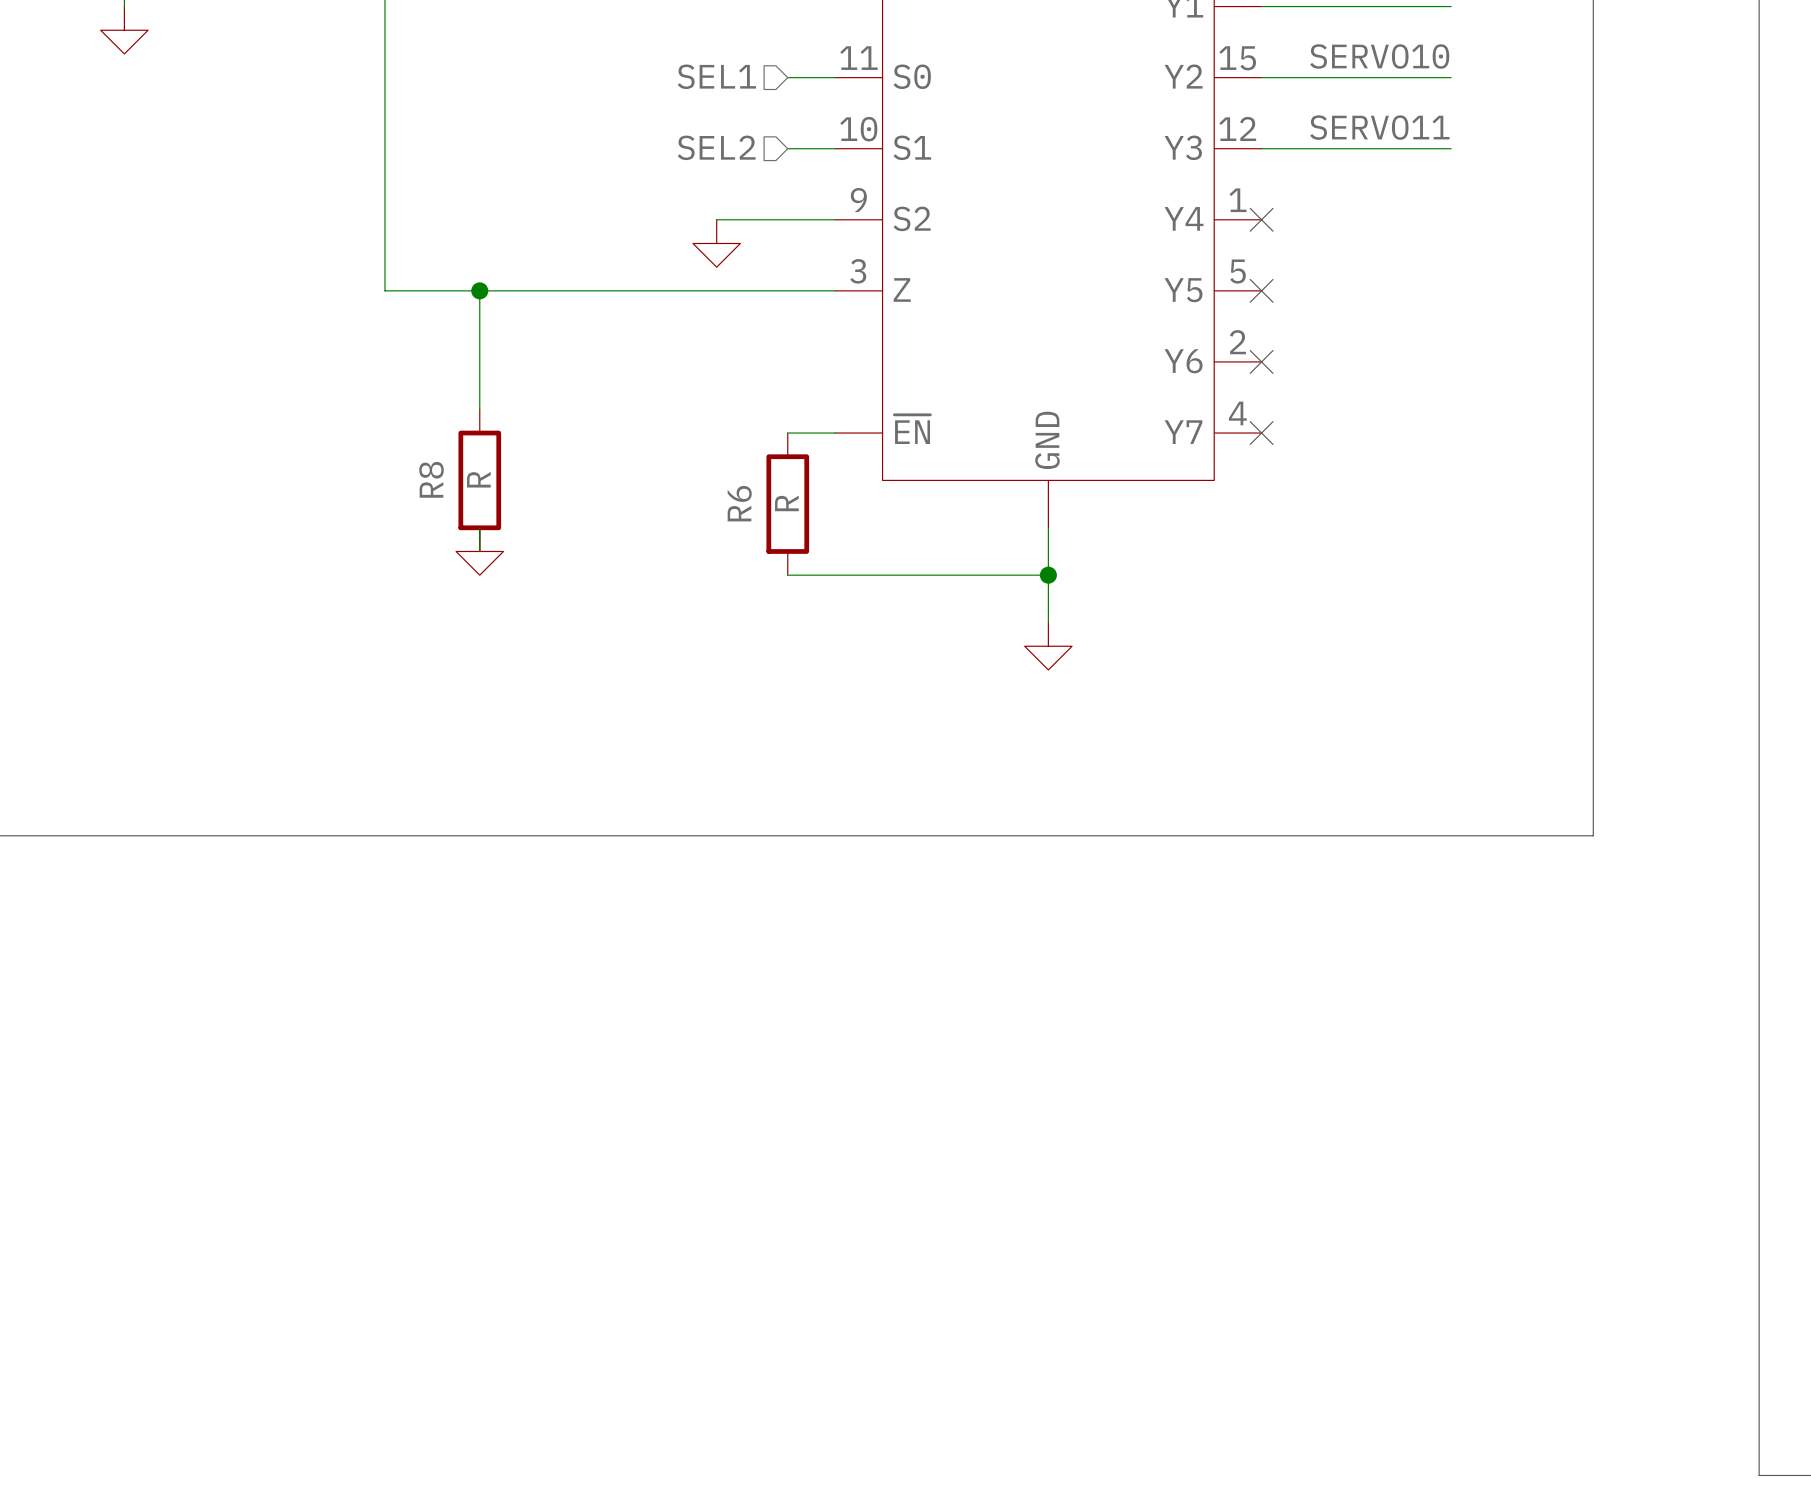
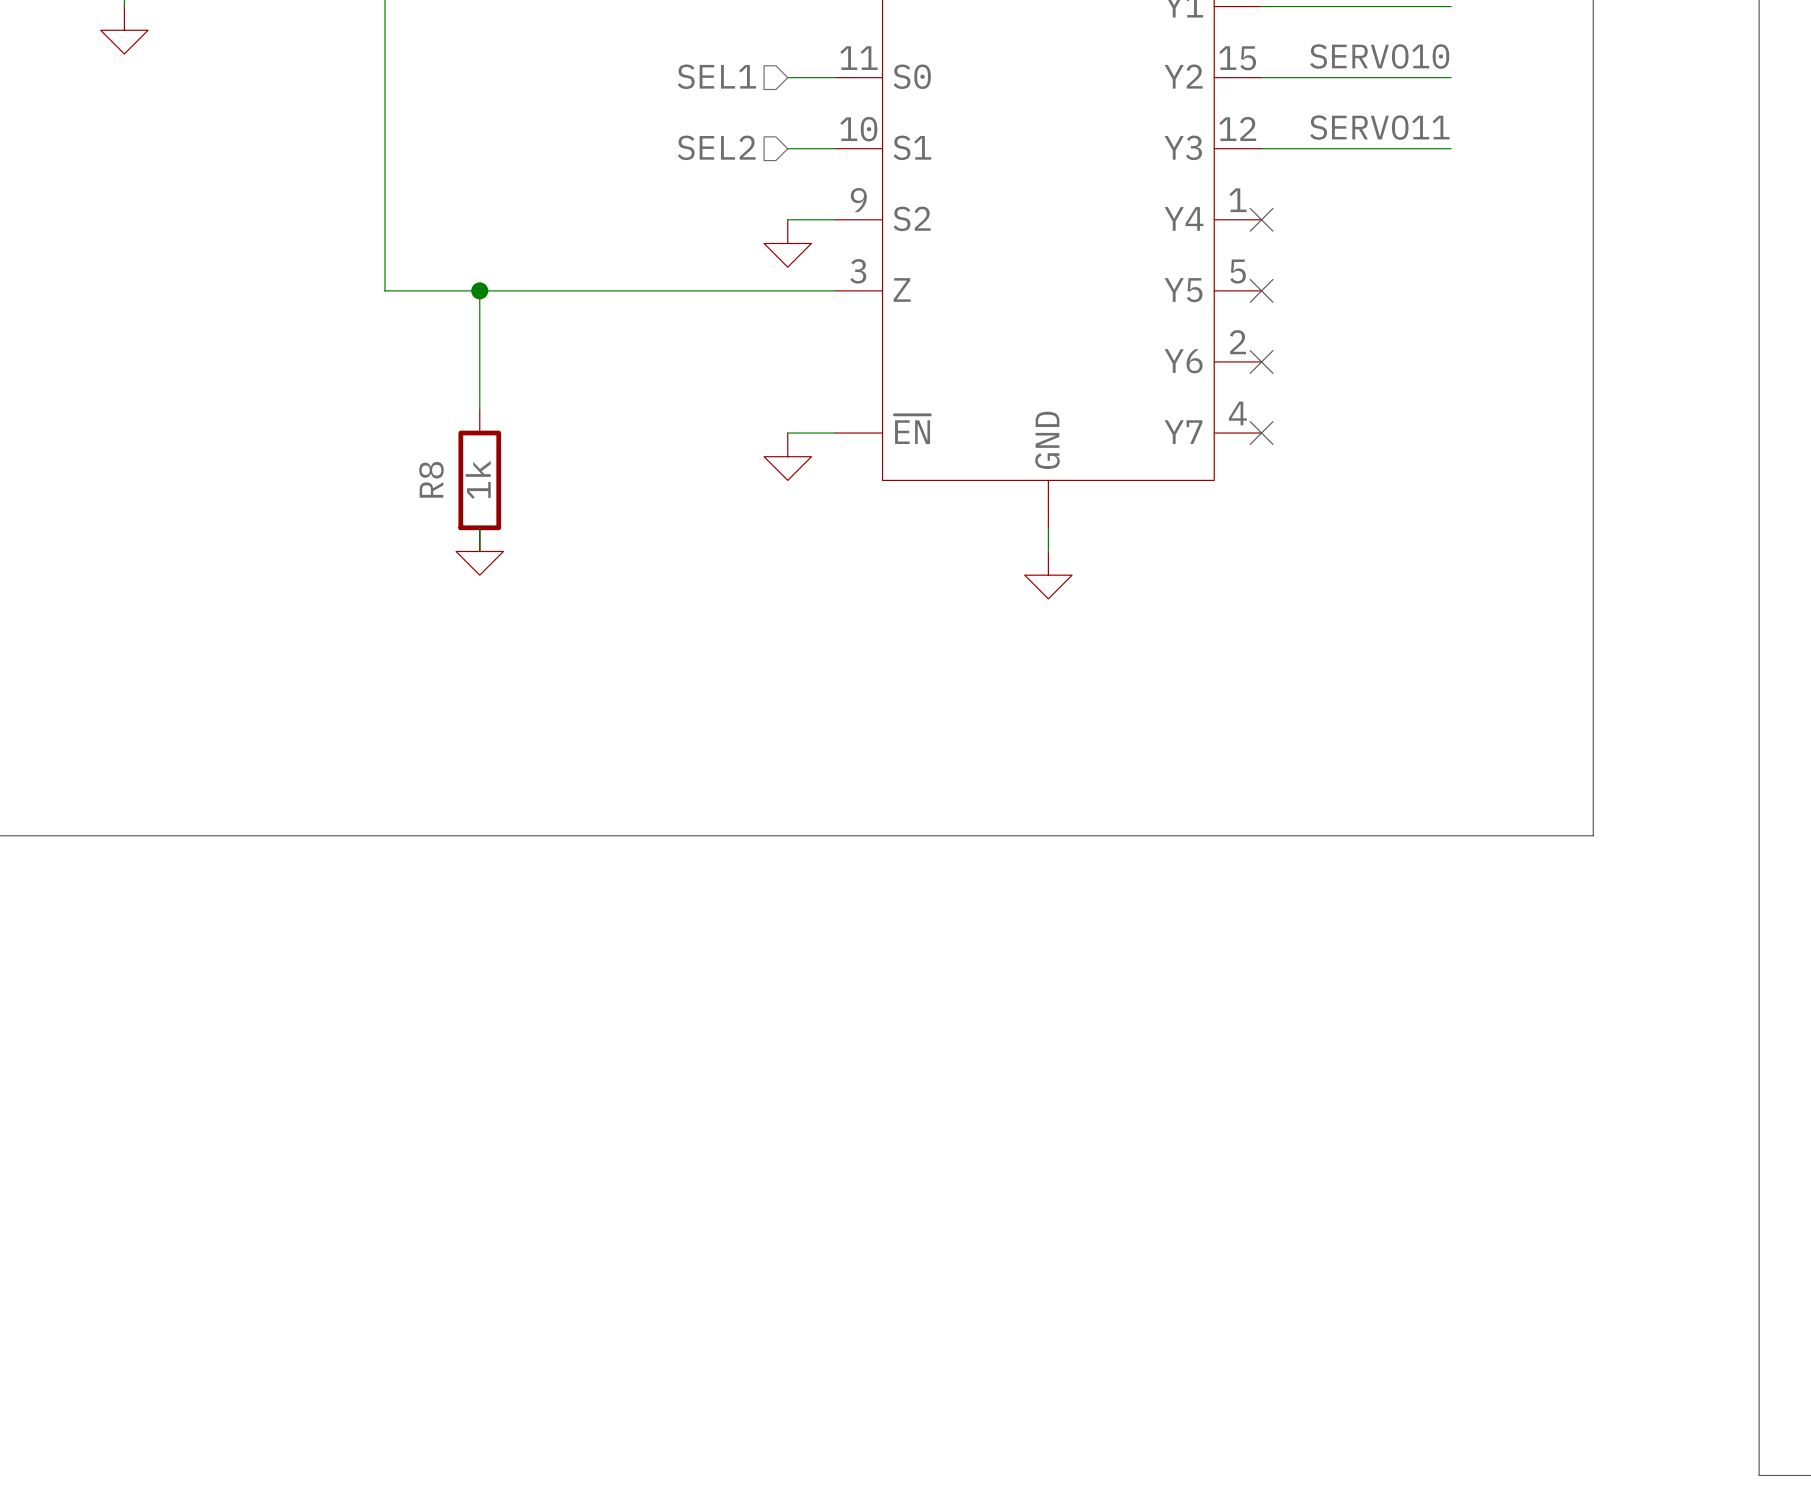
wire: (716, 219) (787, 219) -> none
power symbol position: (716, 243) -> (787, 243)
power symbol: none -> (787, 456)
R8 value: R (478, 479) -> 1k (478, 479)
R6: R (787, 504) -> none
wire: (1048, 551) (1048, 622) -> none
wire: (787, 575) (1048, 575) -> none
junction: (1048, 575) -> none
power symbol position: (1048, 646) -> (1048, 575)

